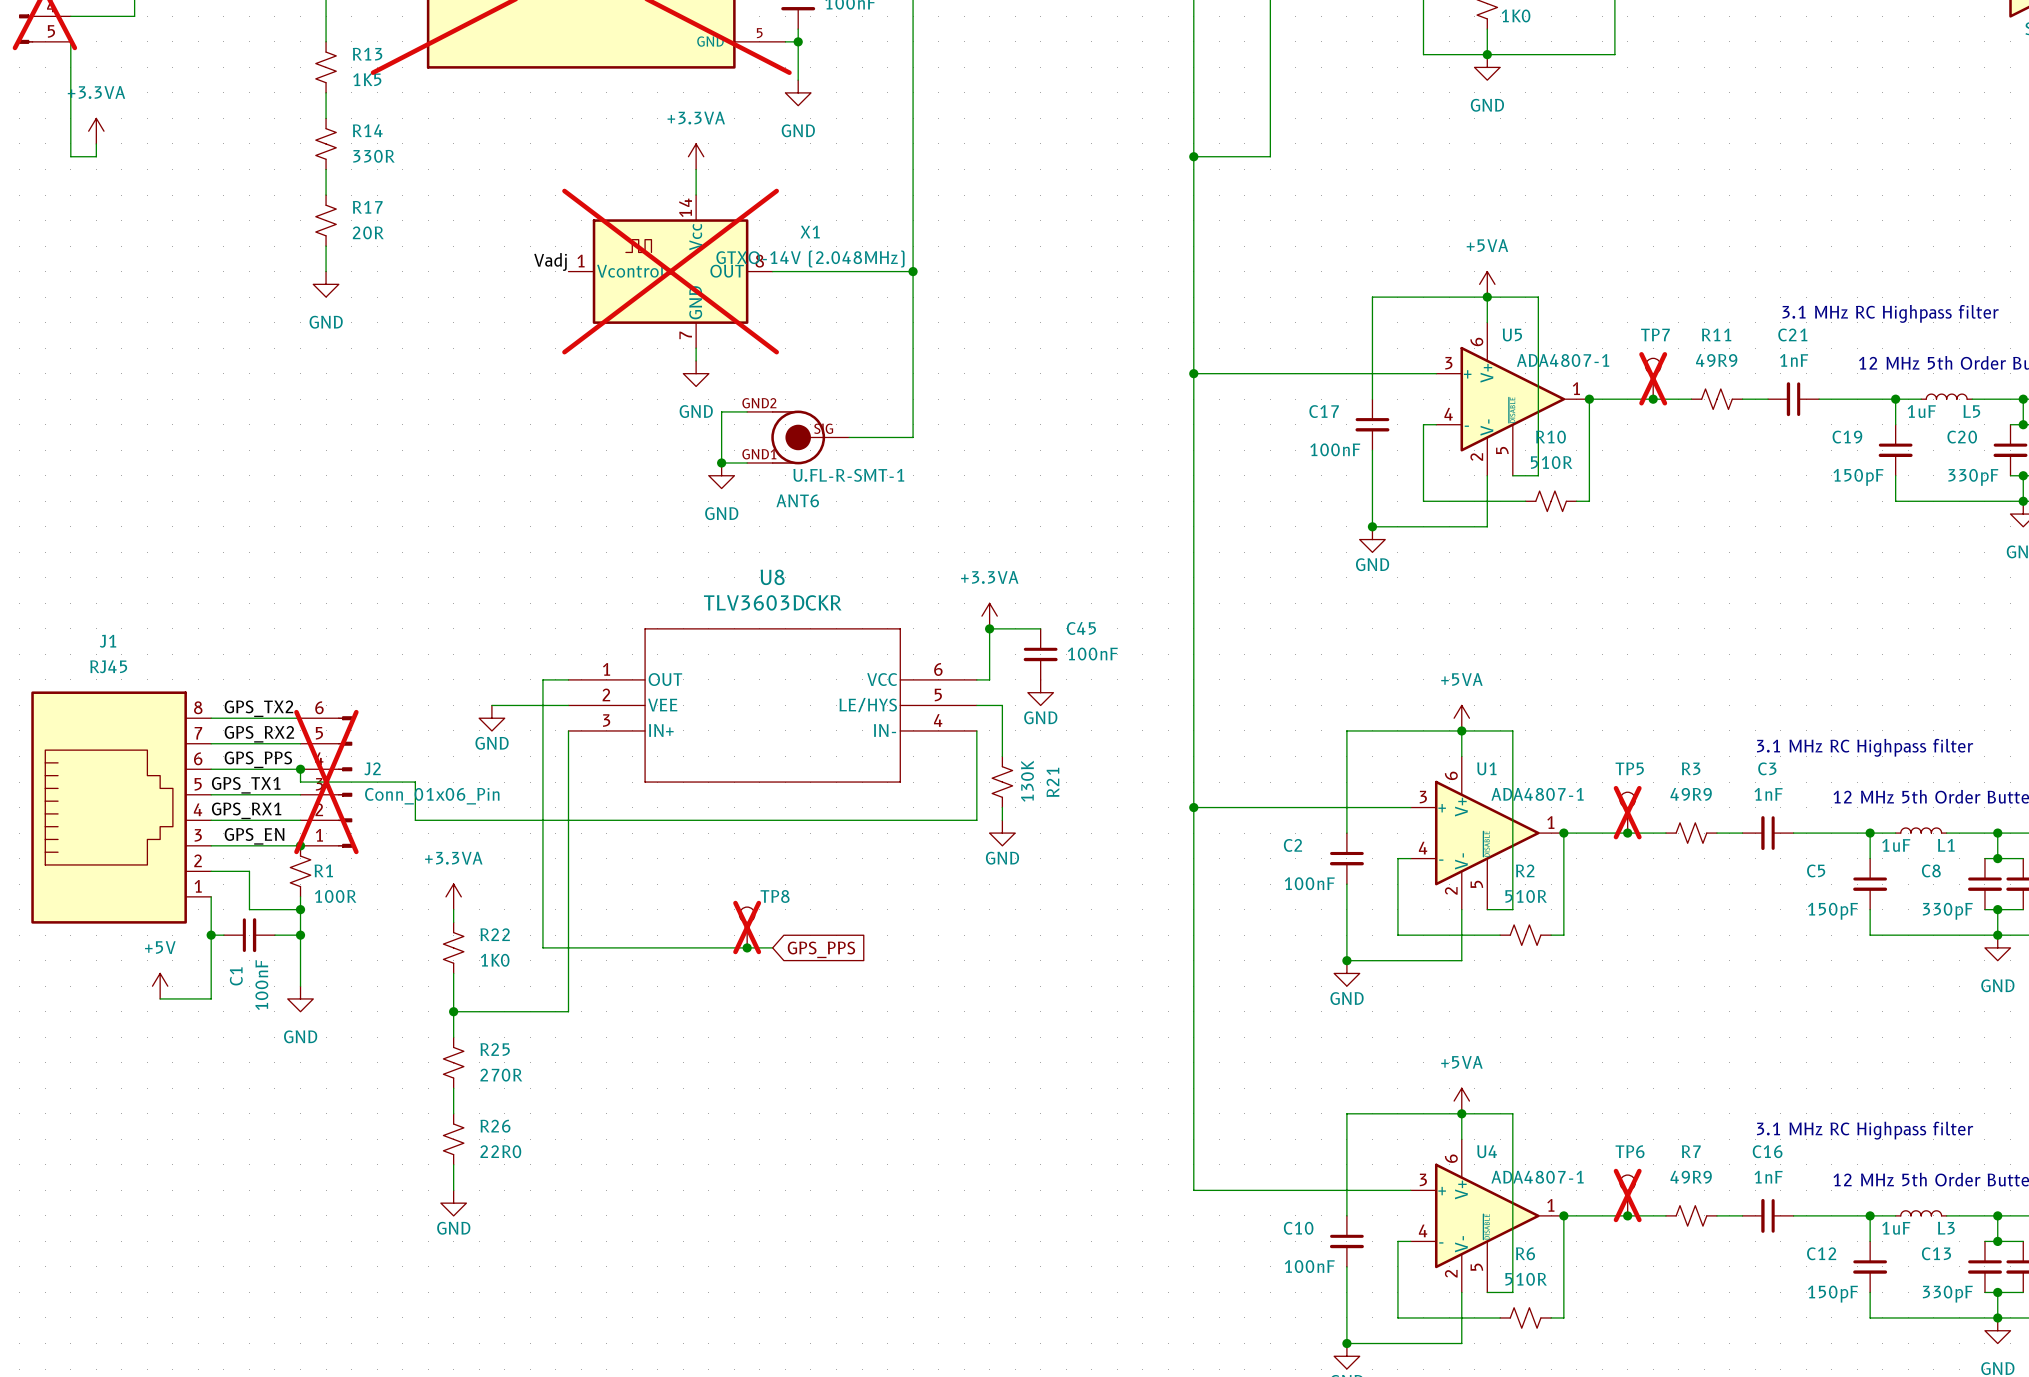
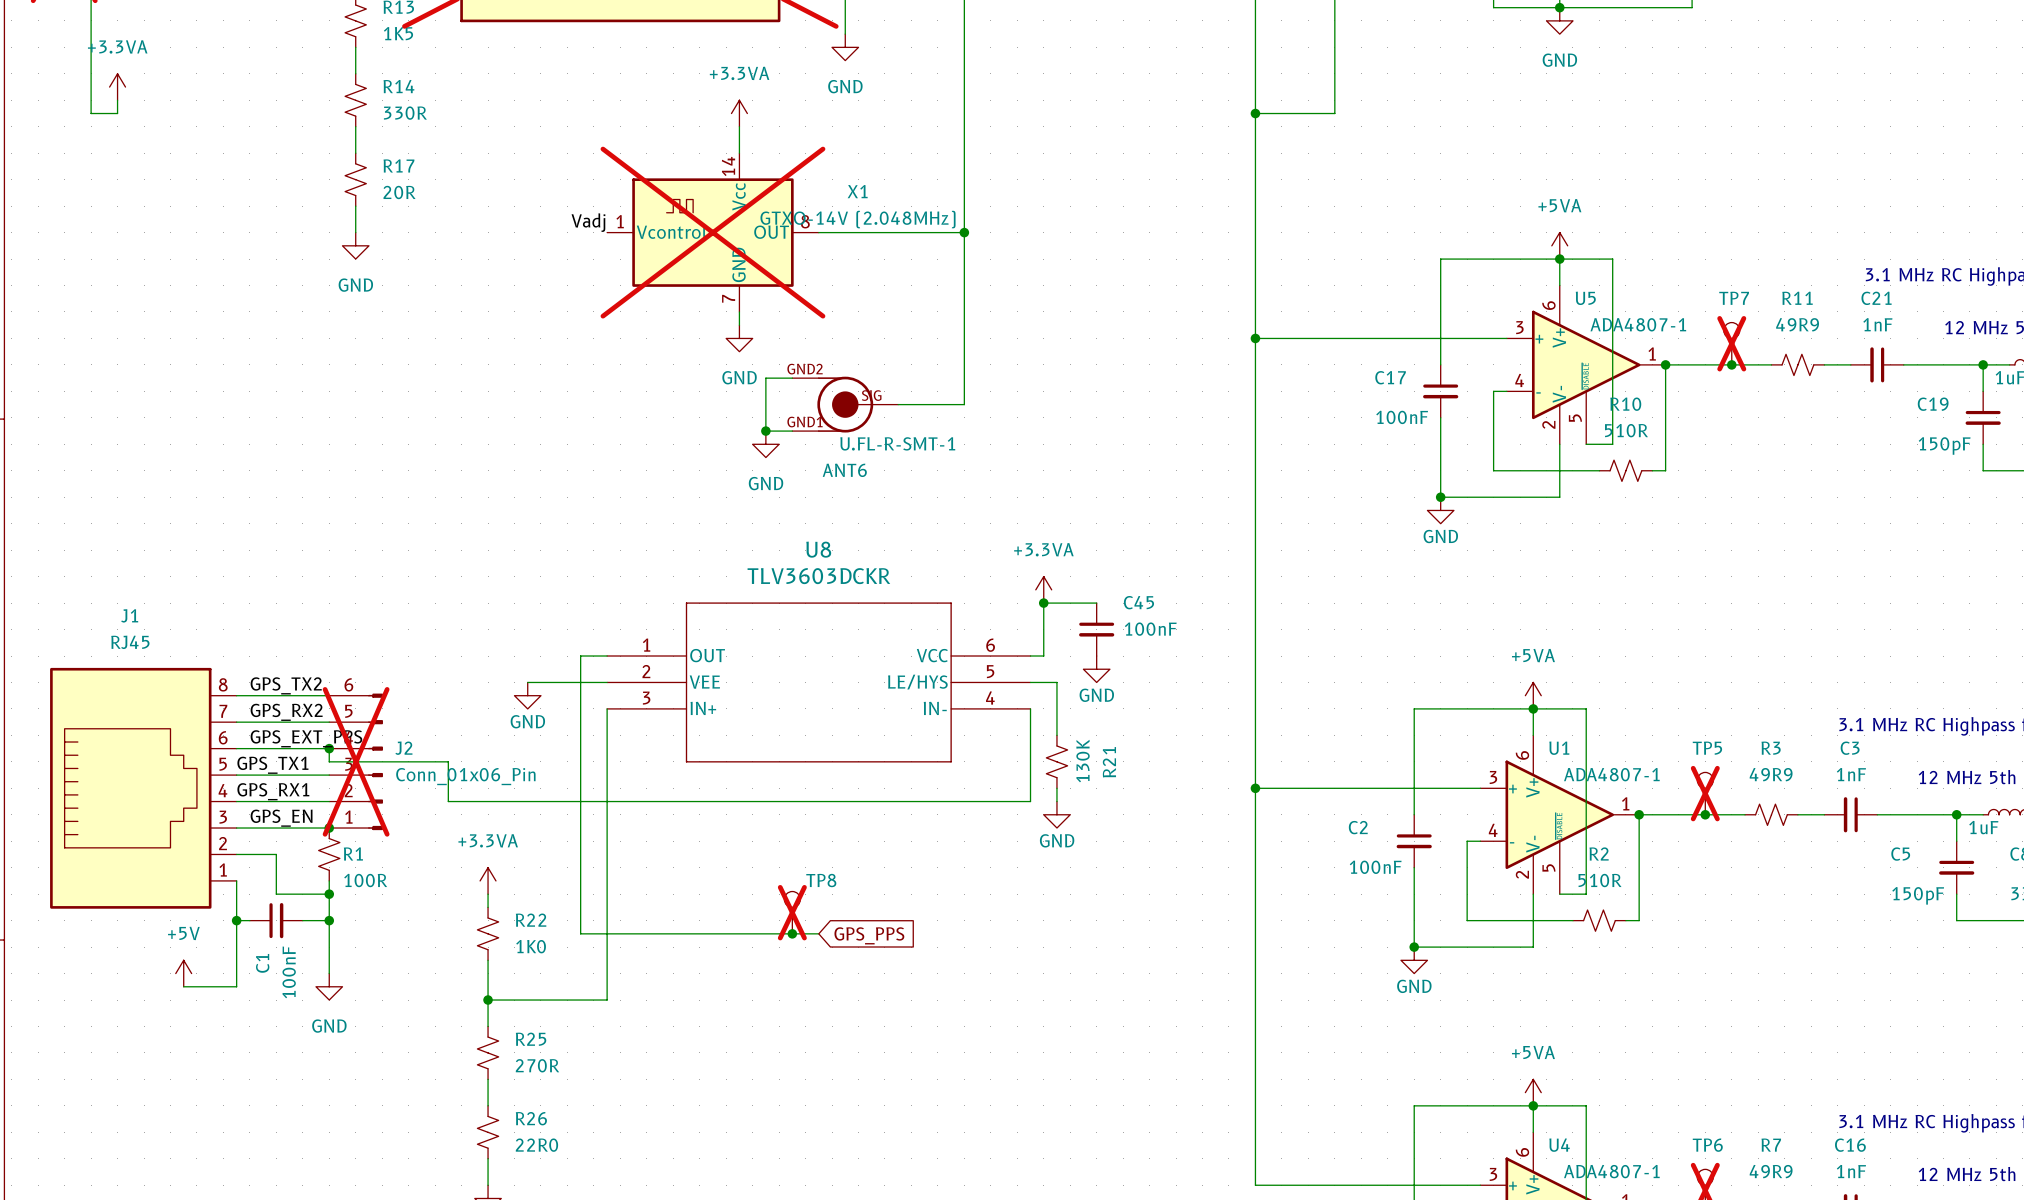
label: GPS_PPS (258, 759) -> GPS_EXT_PPS (306, 738)

